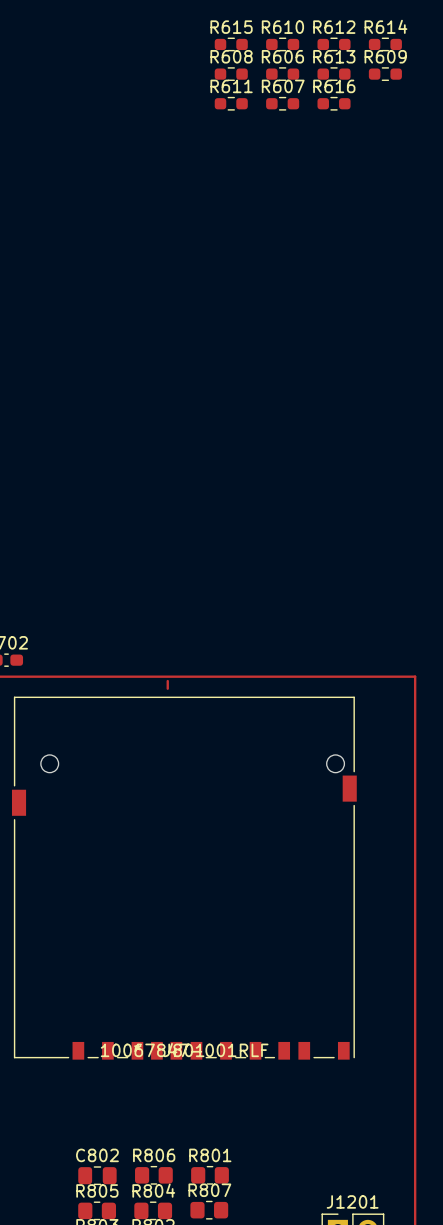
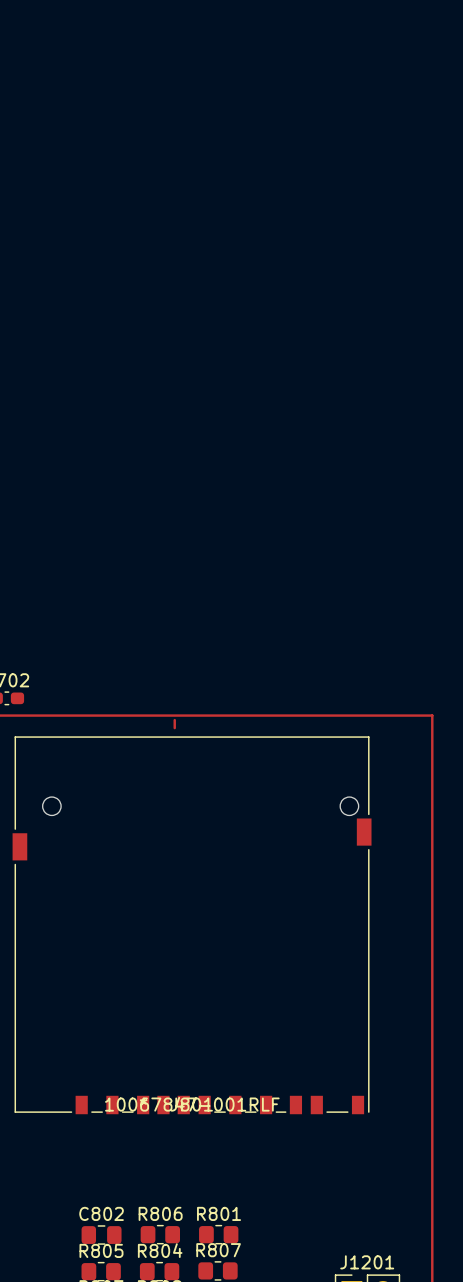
R615: (231, 44) -> none
R610: (282, 44) -> none
R612: (334, 44) -> none
R614: (385, 44) -> none
R608: (231, 74) -> none
R606: (282, 74) -> none
R613: (334, 74) -> none
R609: (385, 74) -> none
R611: (231, 103) -> none
R607: (282, 103) -> none
R616: (334, 103) -> none

